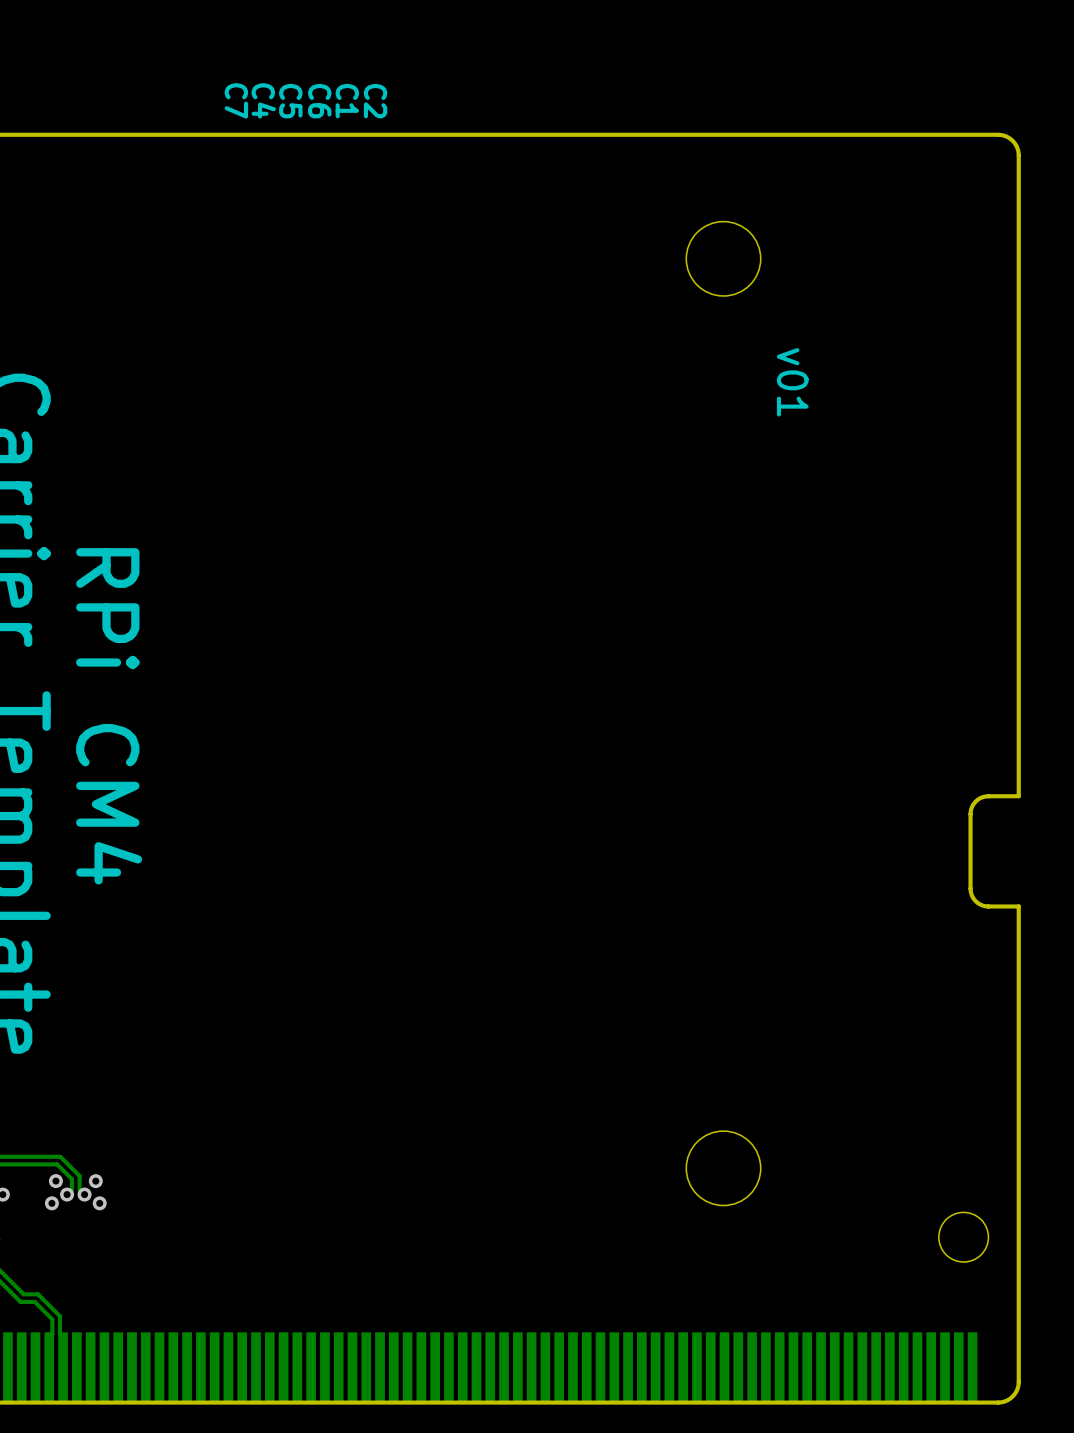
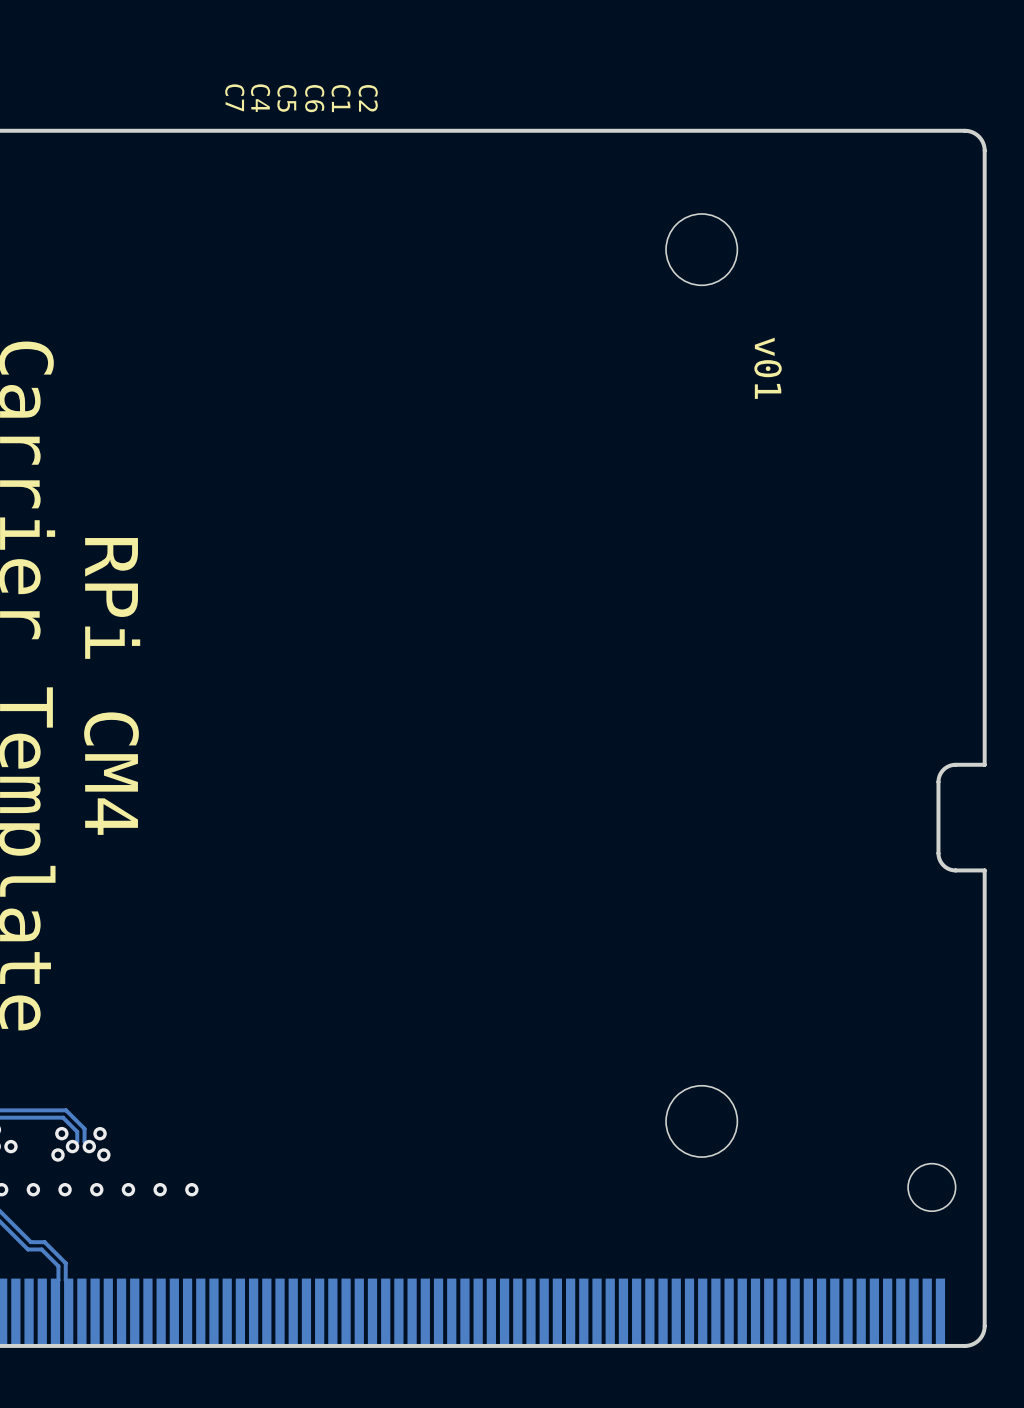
via: none -> (33, 1189)
via: none -> (65, 1189)
via: none -> (96, 1189)
via: none -> (128, 1189)
via: none -> (160, 1189)
via: none -> (191, 1189)

